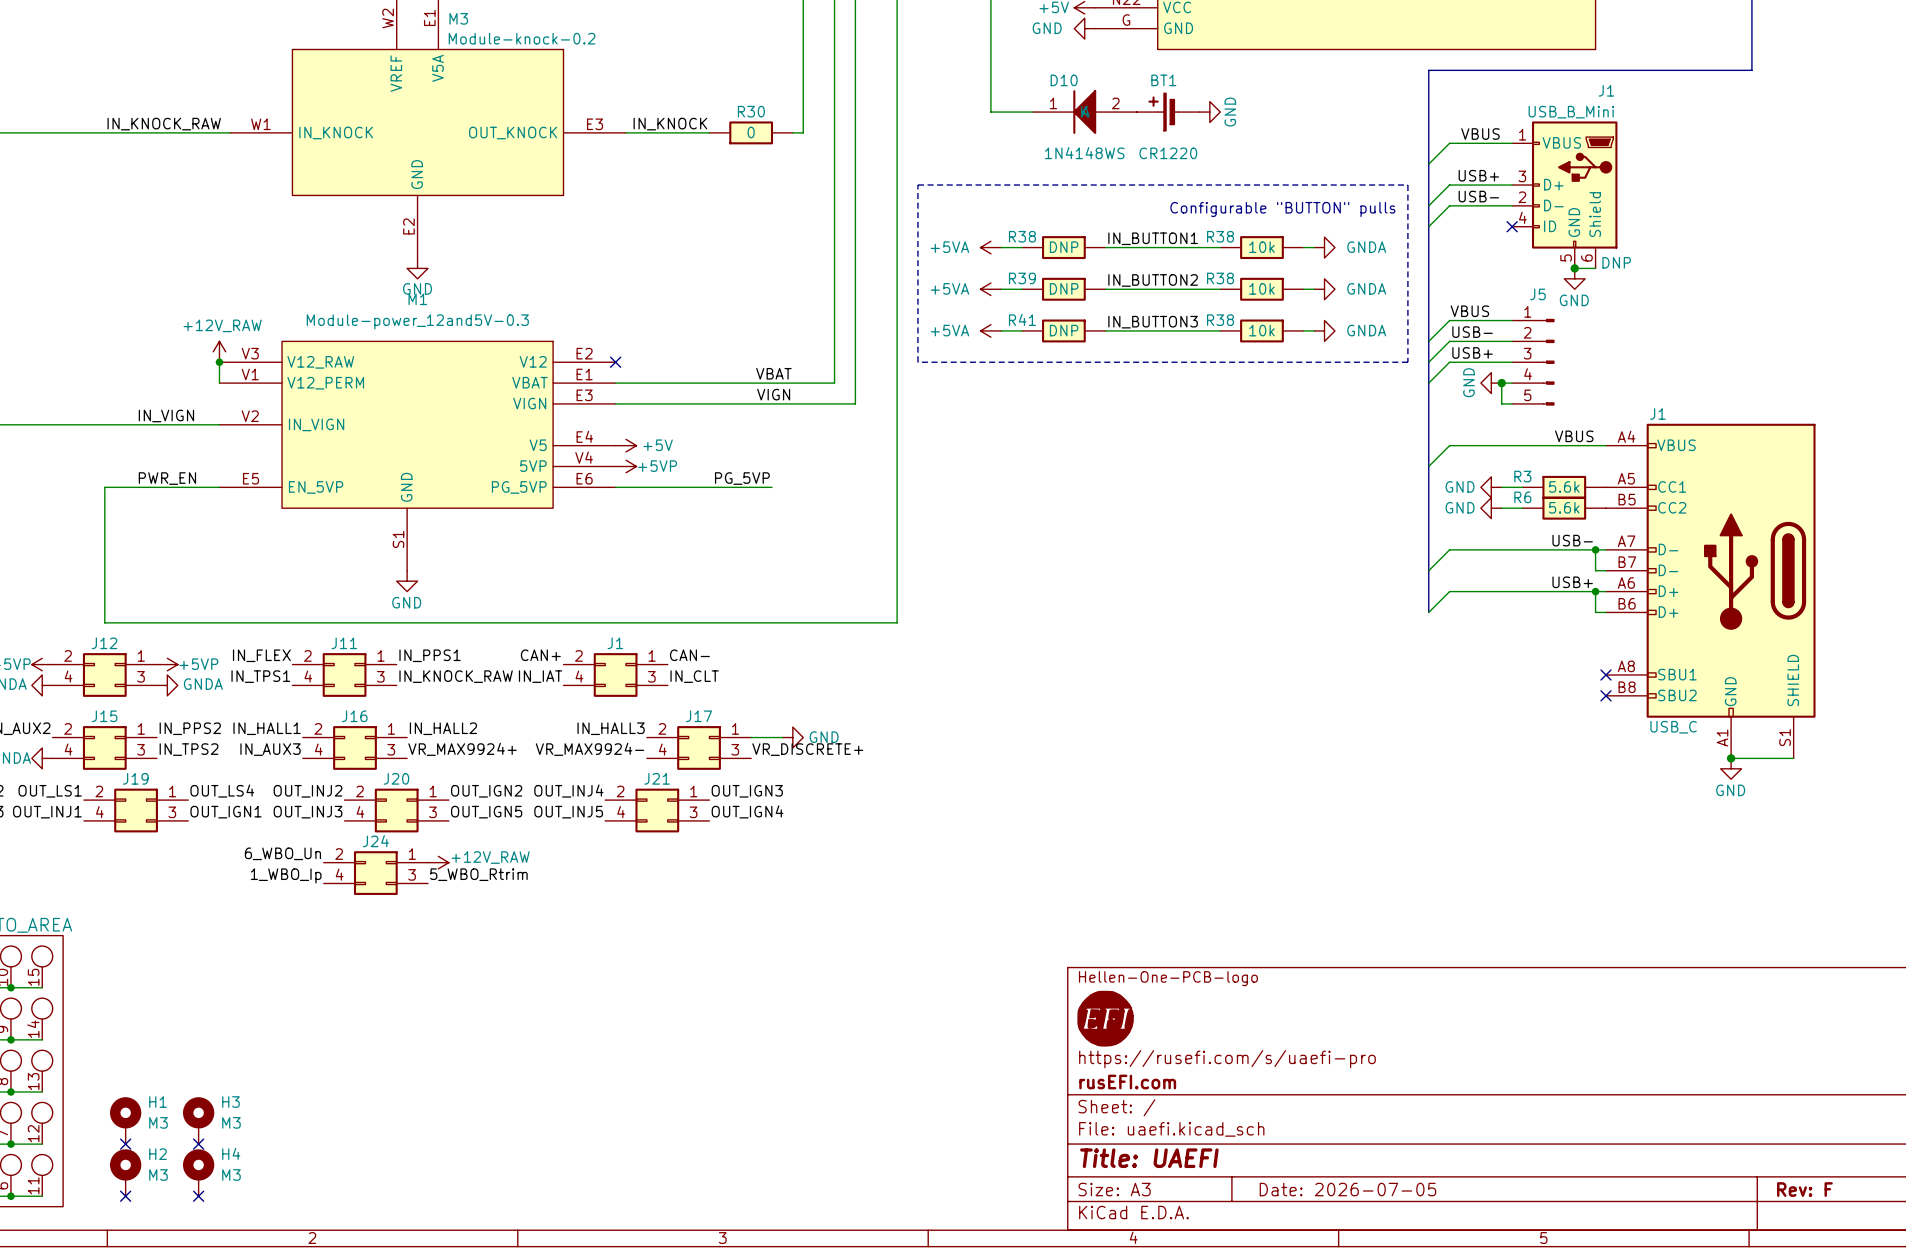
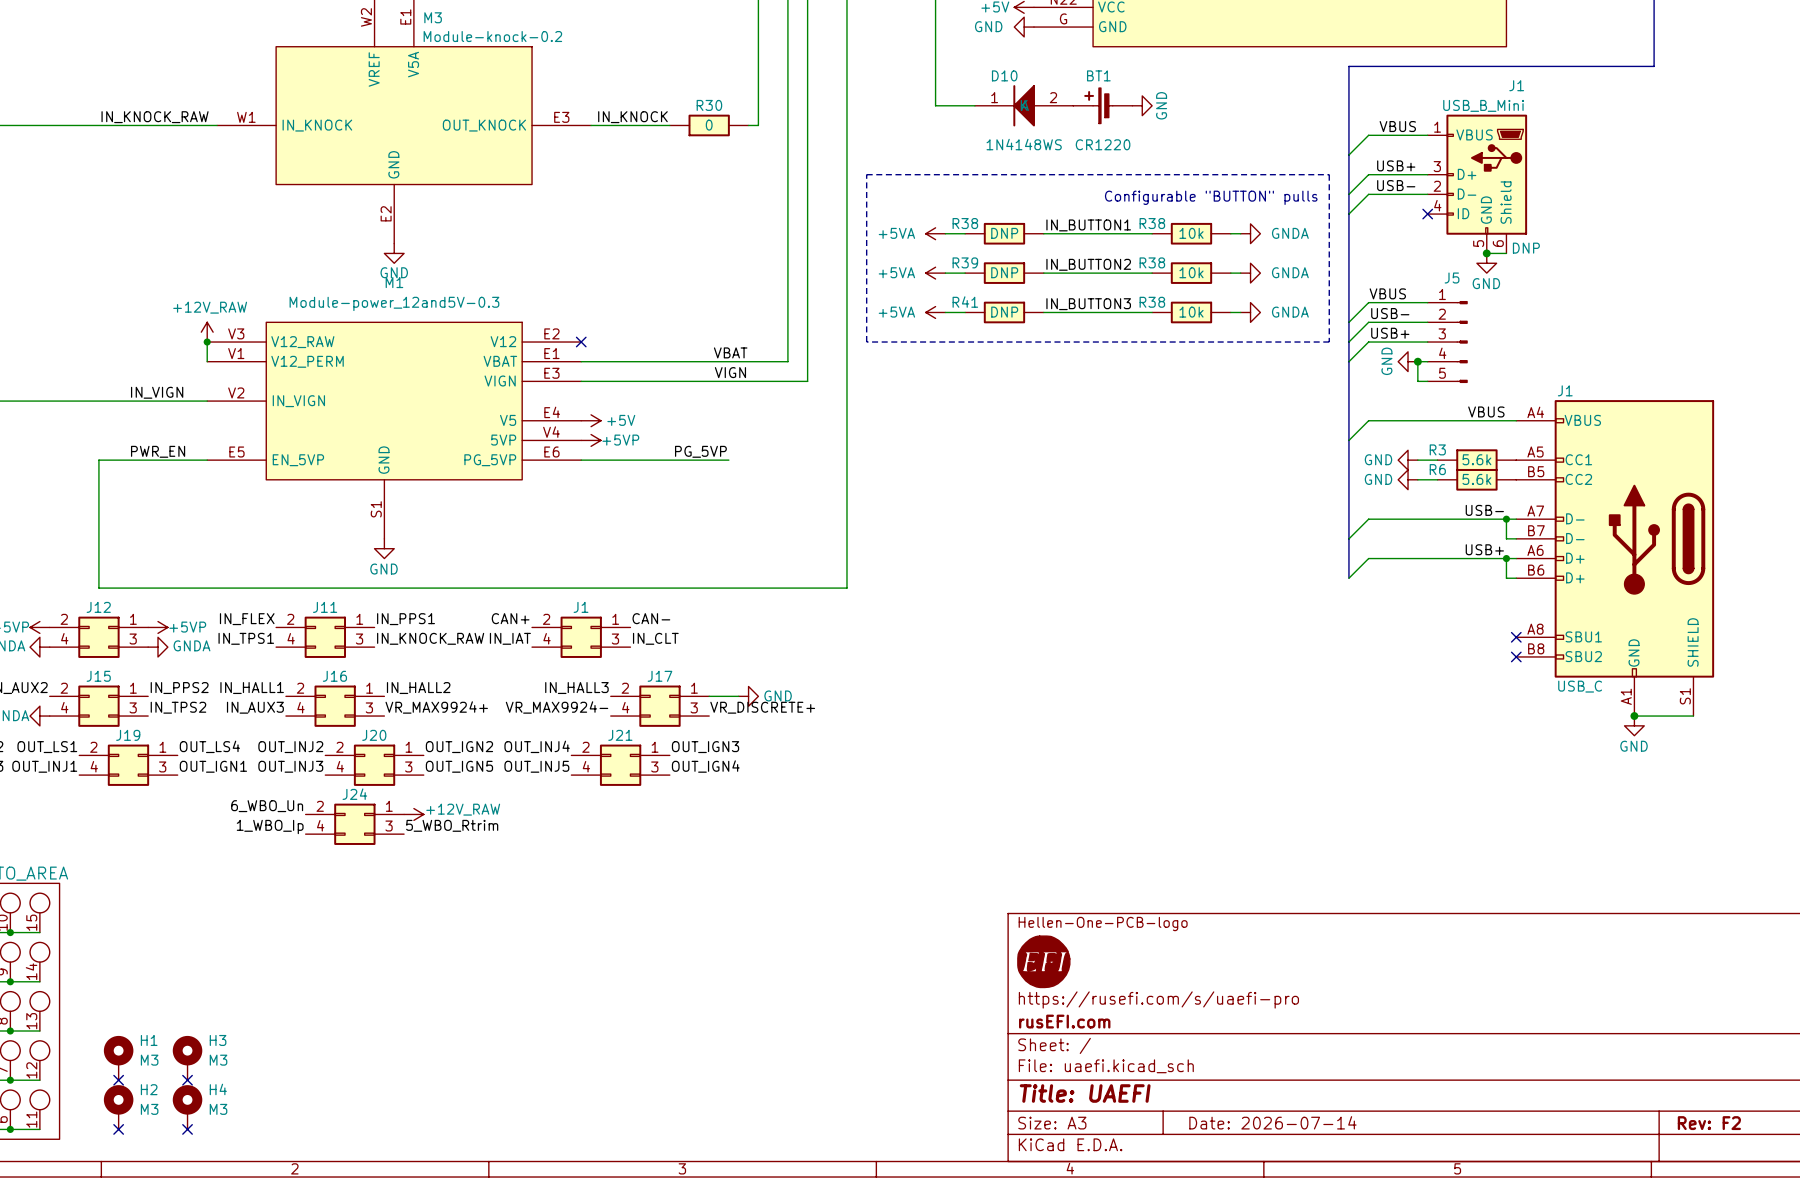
title block: Date: 2026-07-05 (1347, 1189) -> Date: 2026-07-14 (1272, 1122)
title block: Rev: F (1804, 1189) -> Rev: F2 (1709, 1123)

